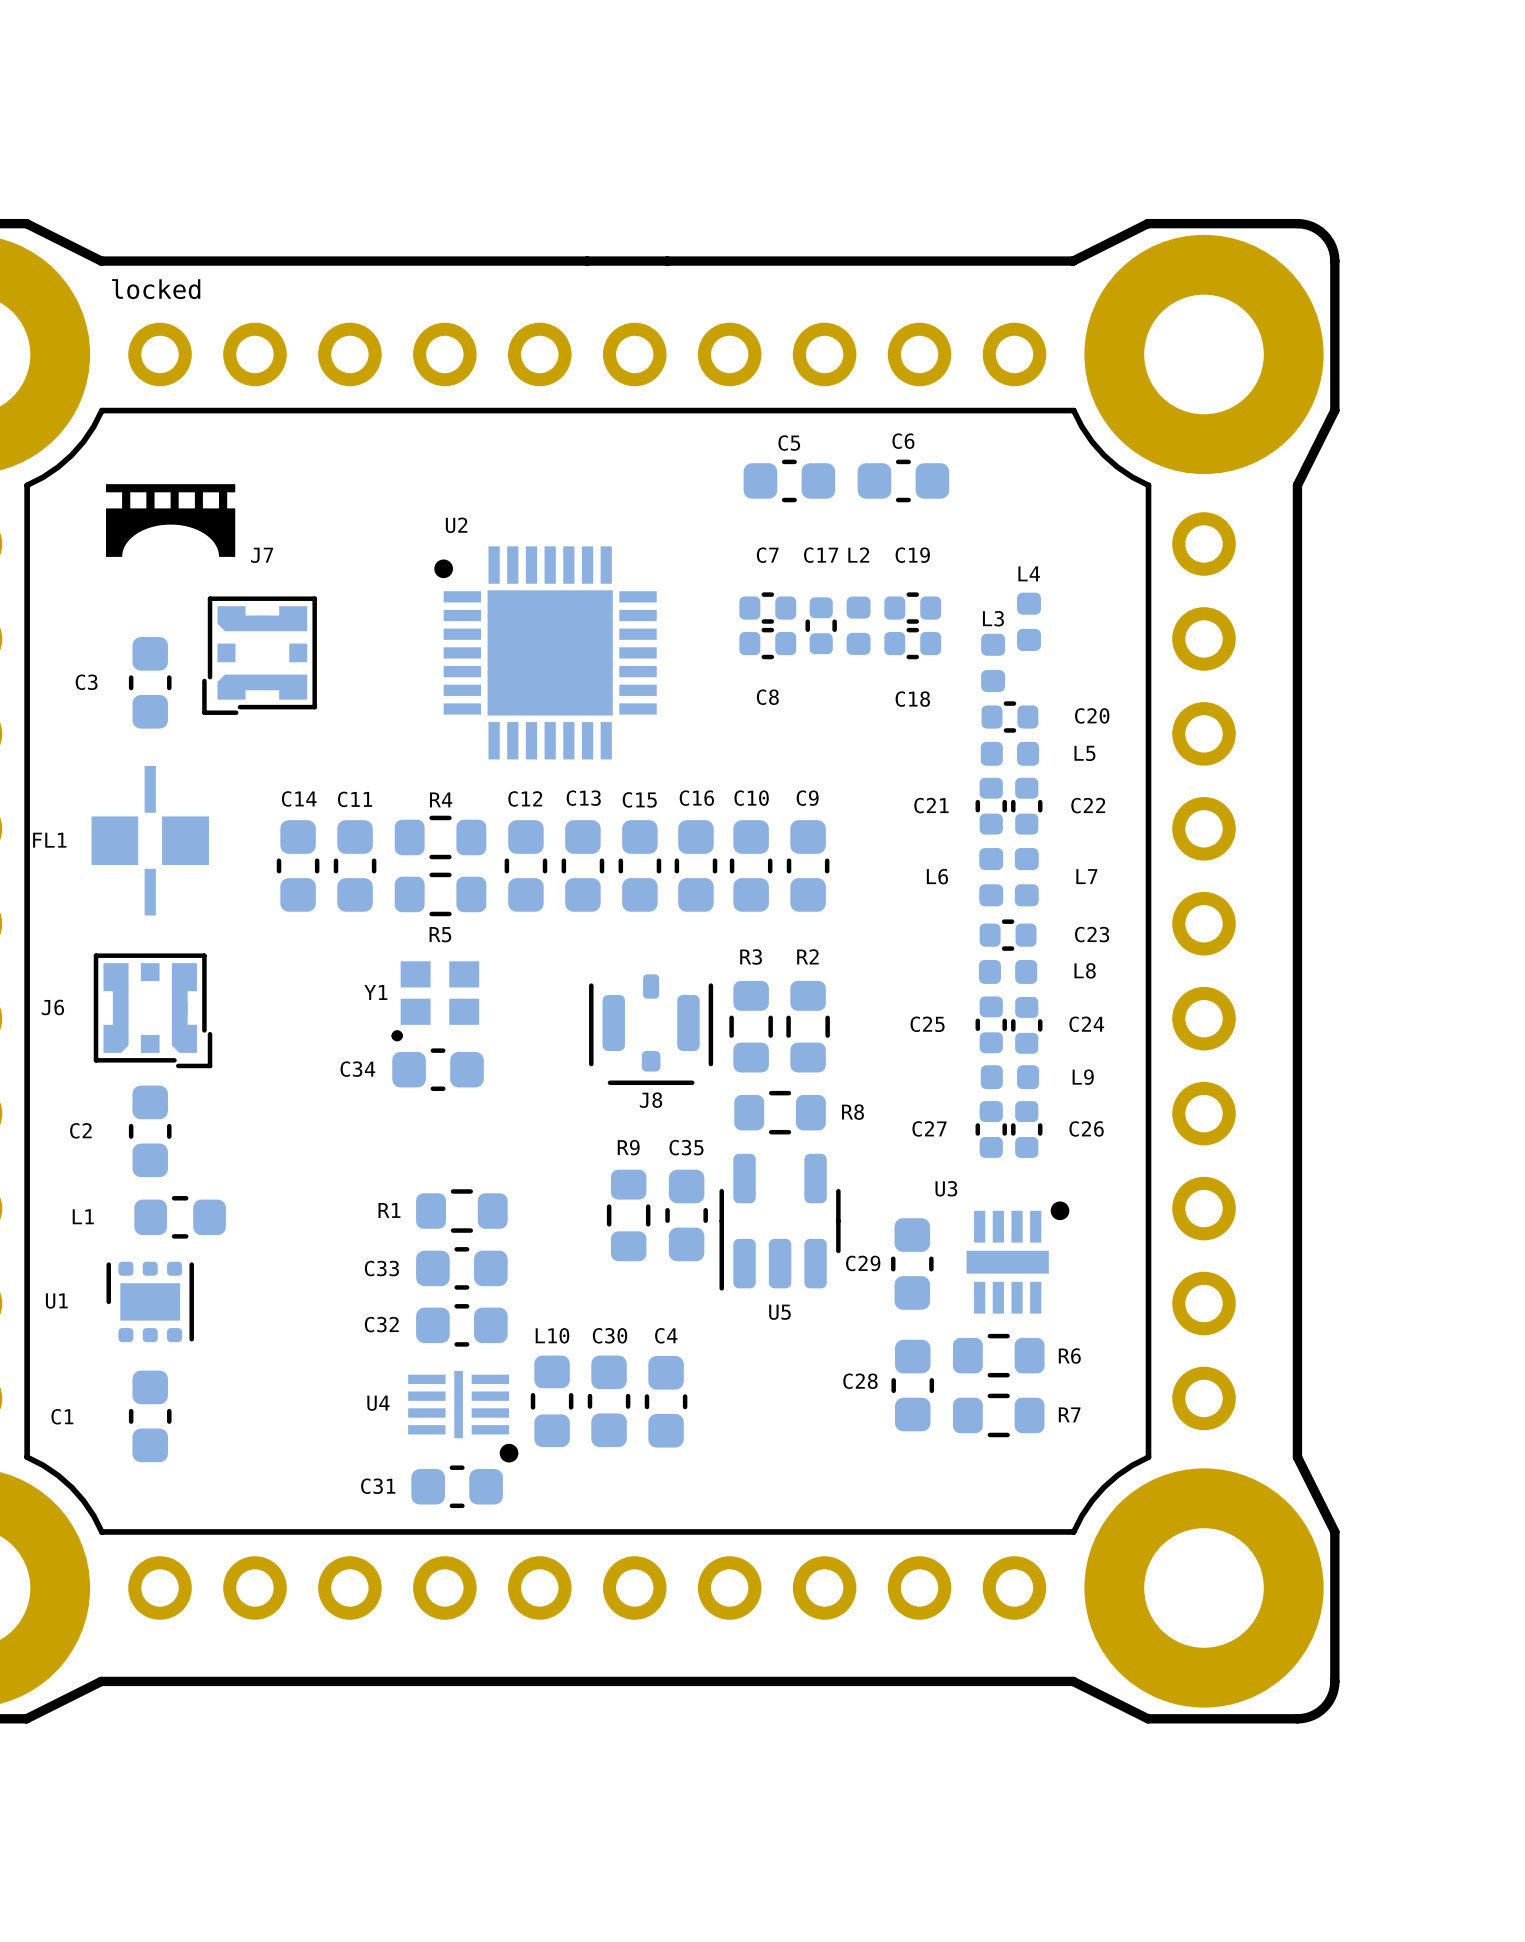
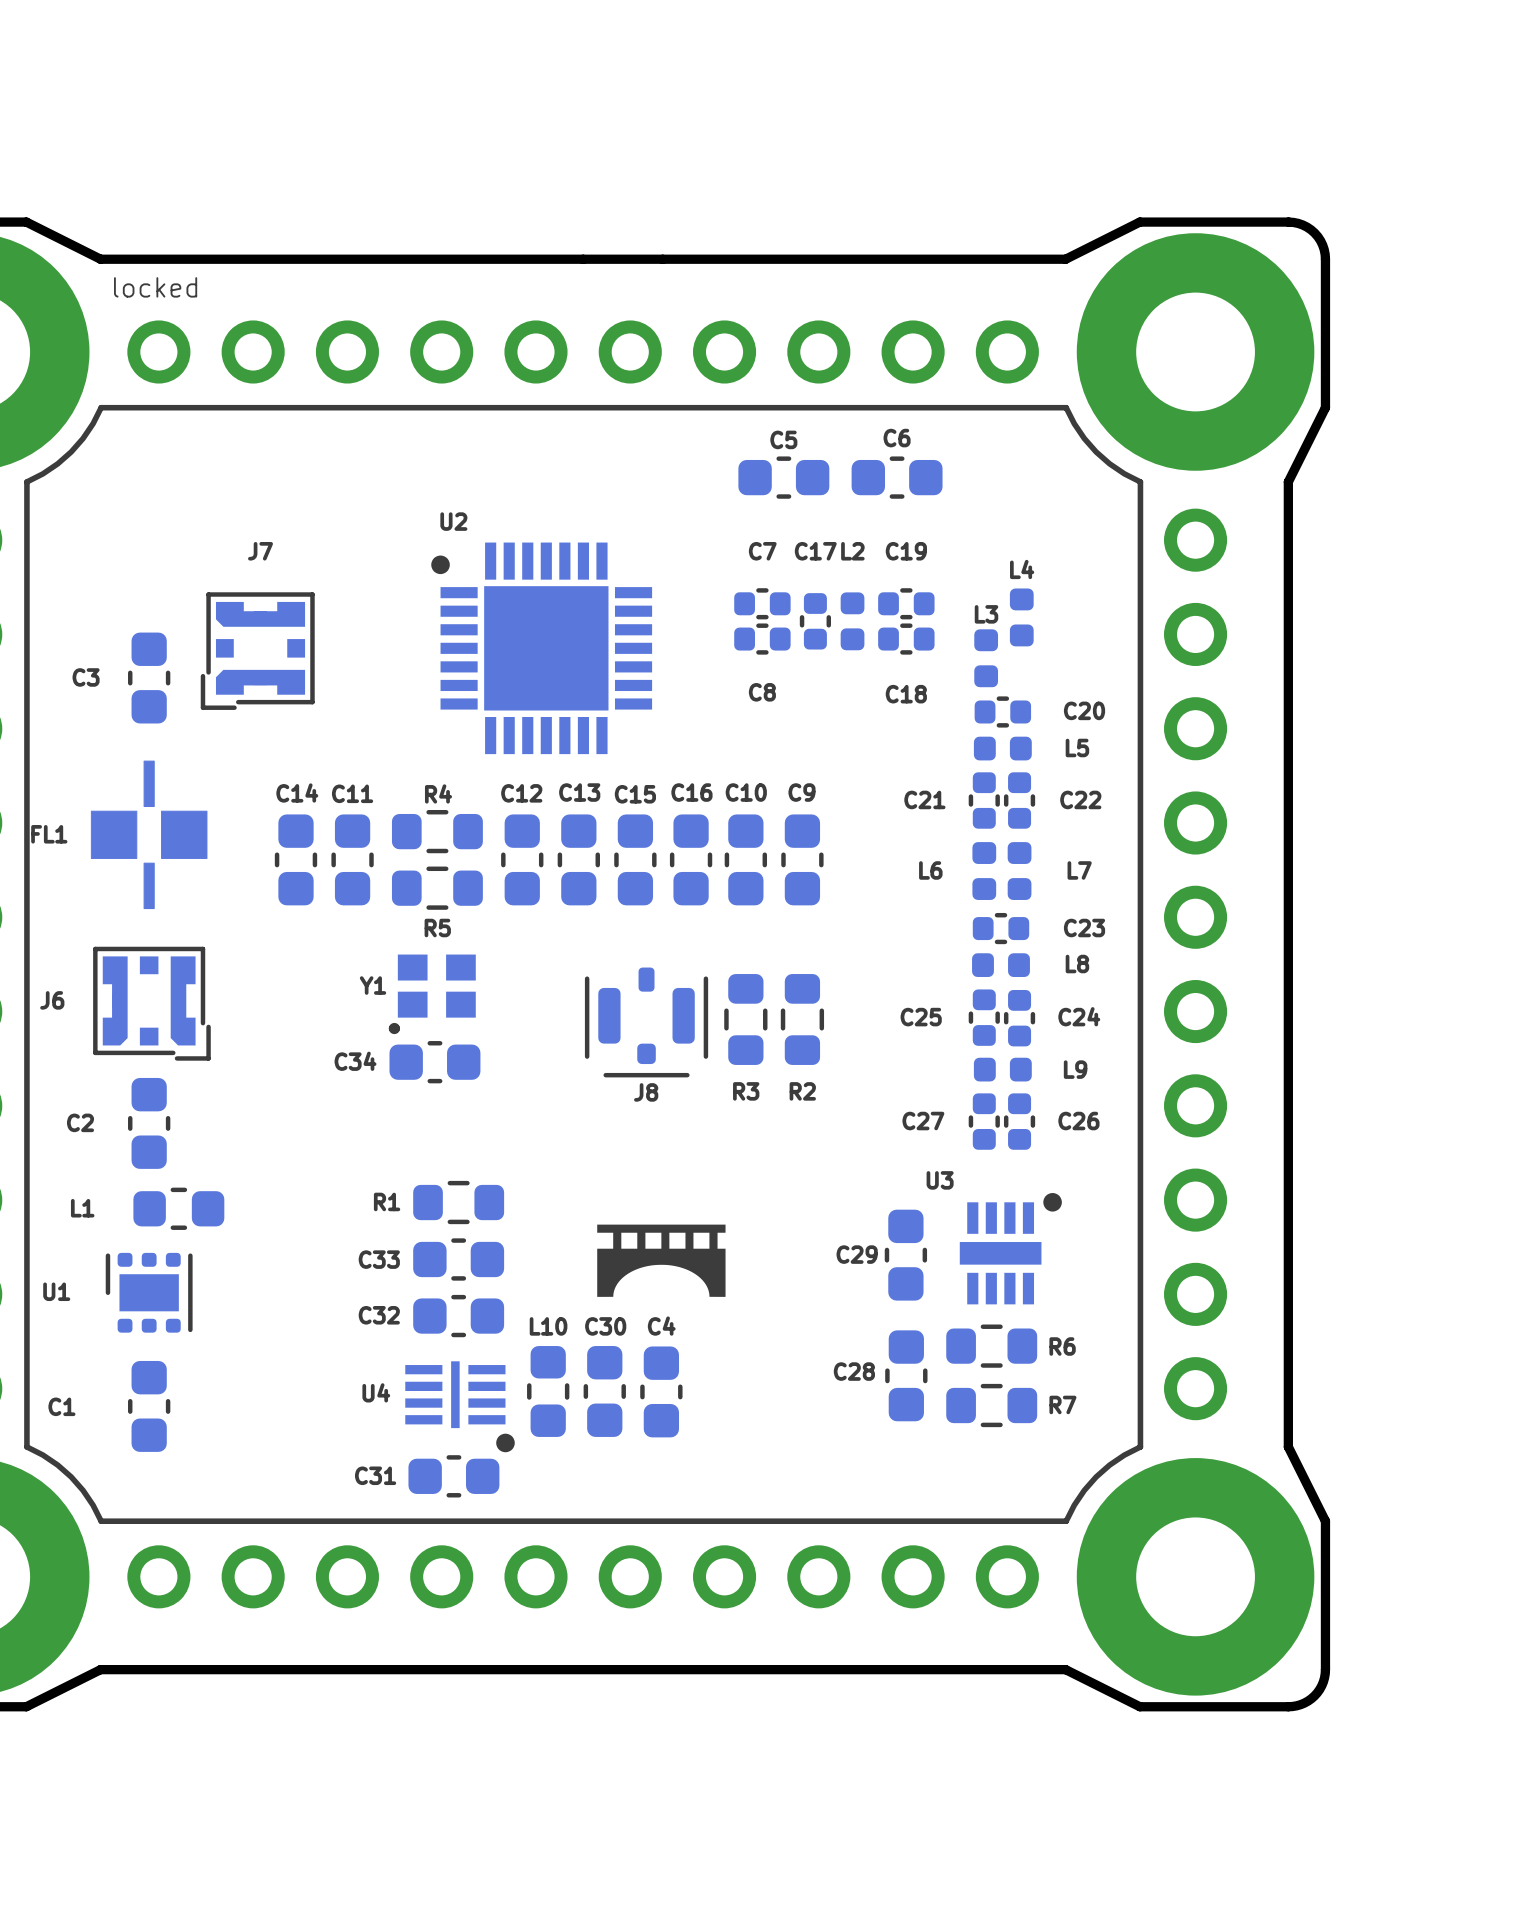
drawing position: (170, 520) -> (661, 1260)
R2 name position: R2 (807, 956) -> R2 (802, 1091)
R3 name position: R3 (751, 957) -> R3 (746, 1091)
R8: (780, 1112) -> none
R9: (628, 1215) -> none
C35: (686, 1215) -> none
U5: (780, 1222) -> none

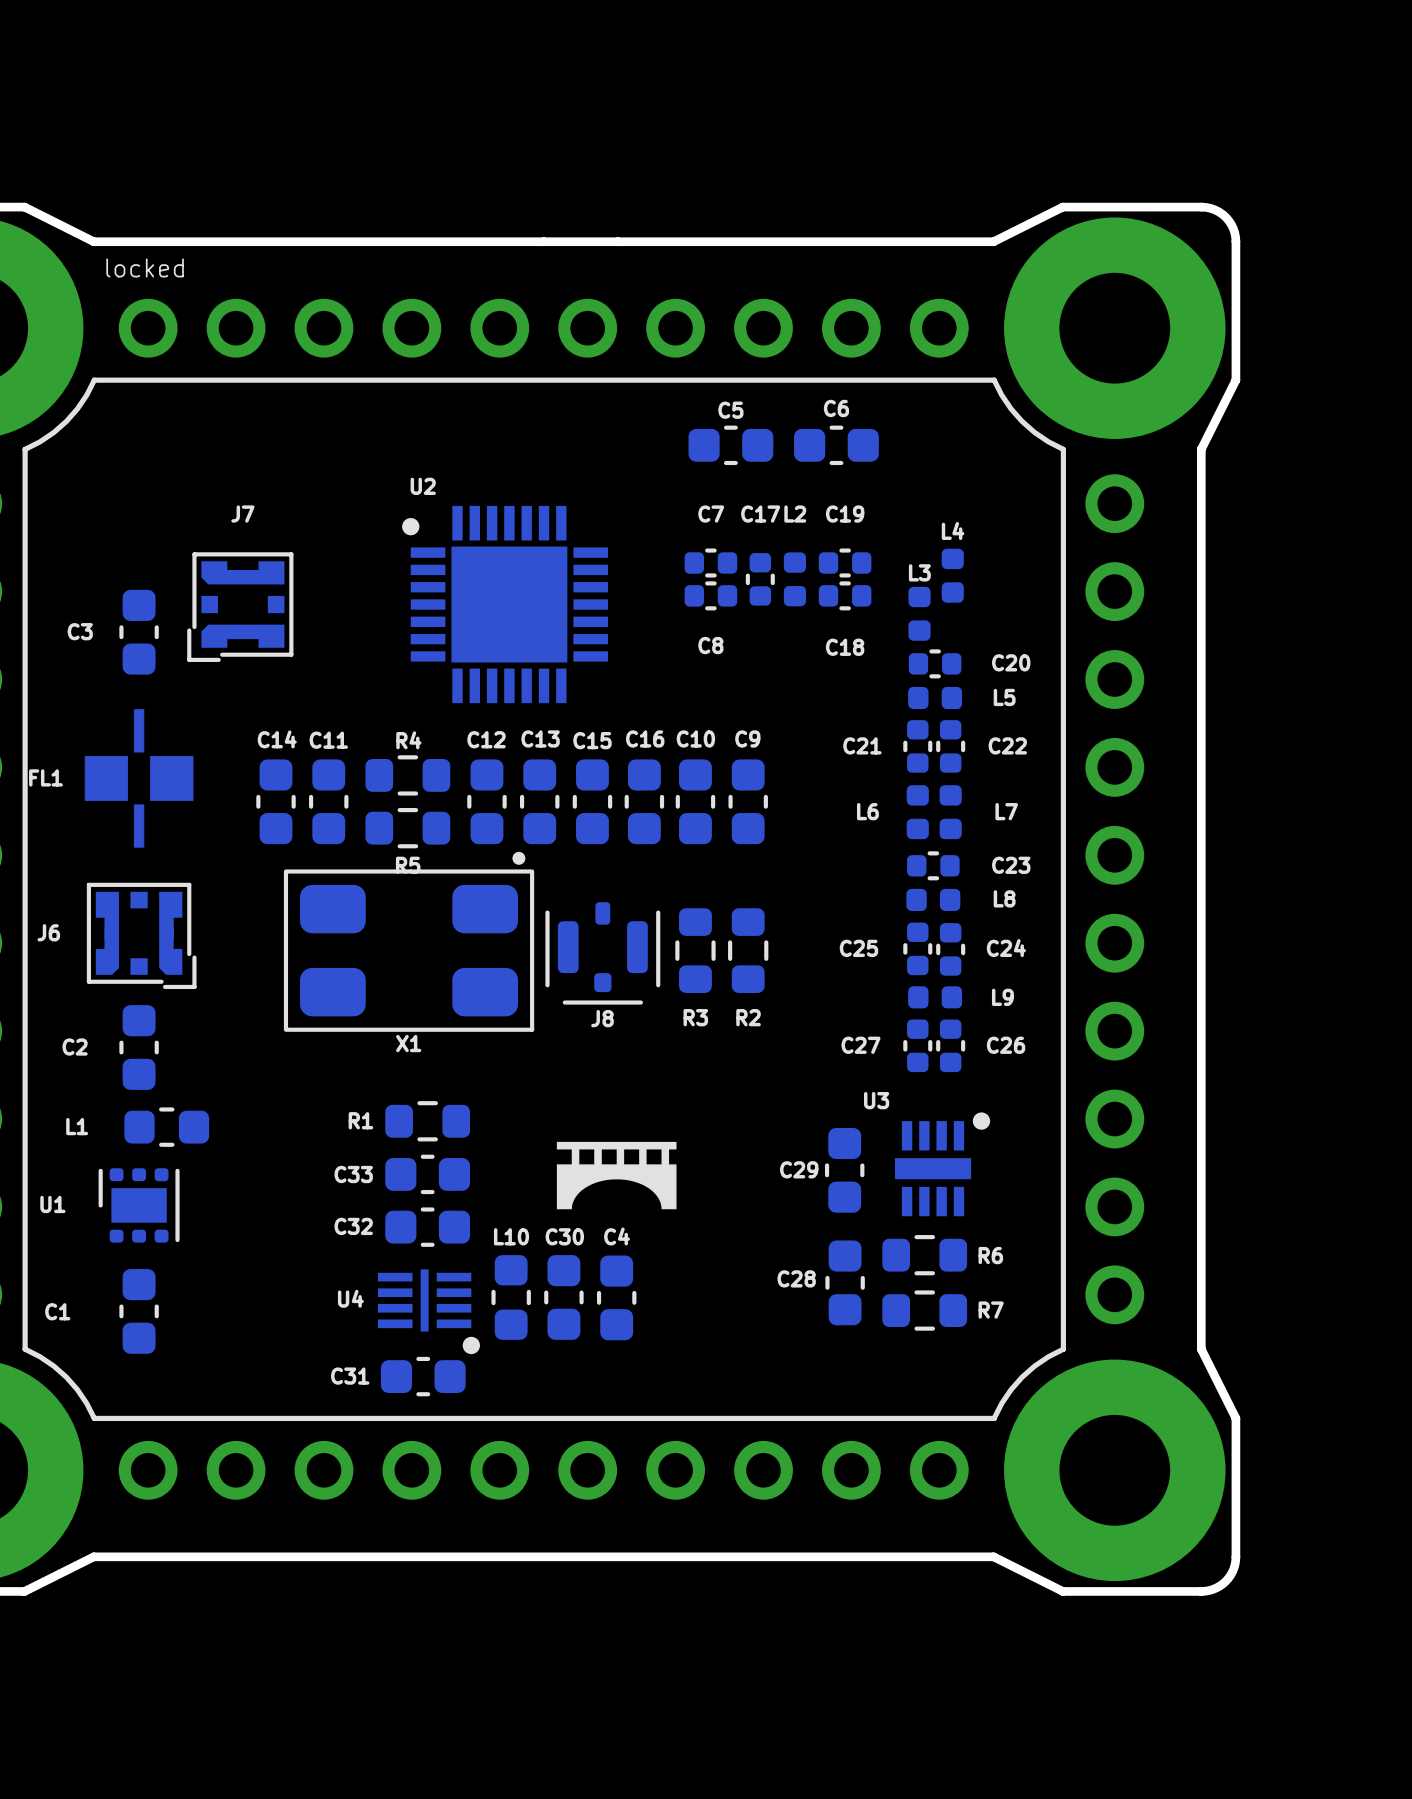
Y1: (432, 994) -> none
X1: none -> (409, 941)
C34: (434, 1062) -> none

